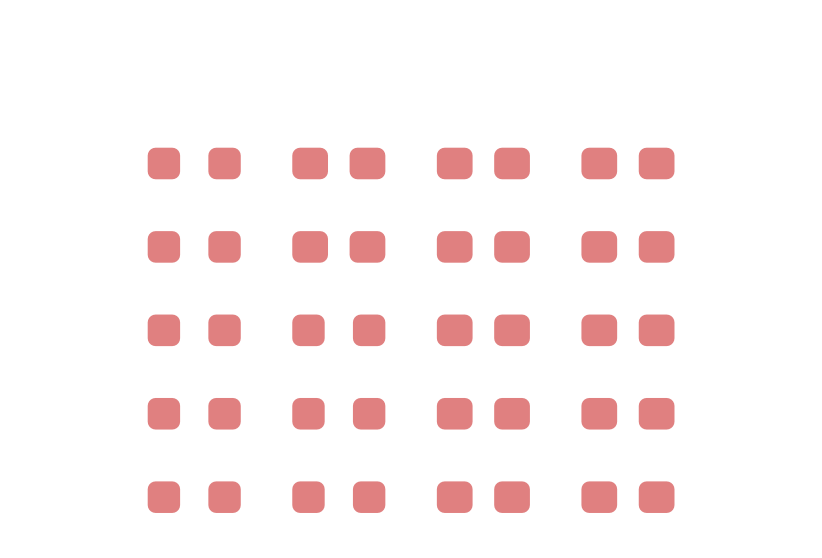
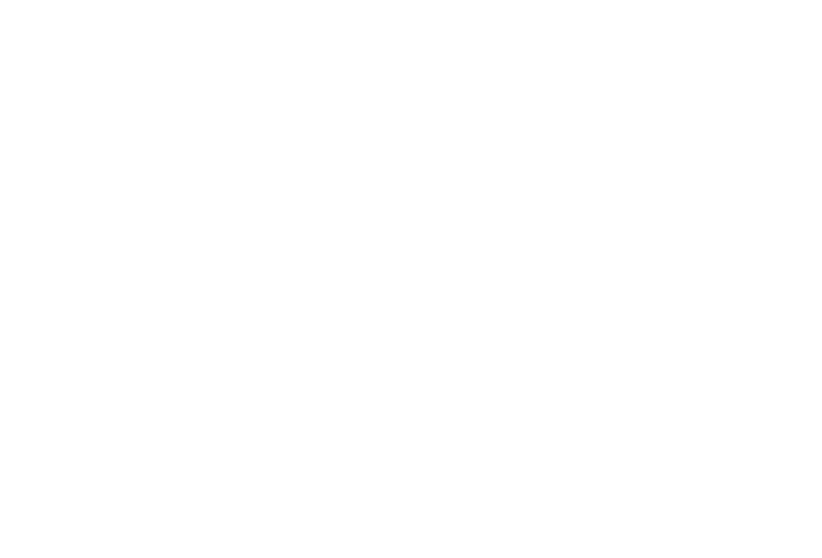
part: (194, 163) -> none
part: (338, 163) -> none
part: (483, 163) -> none
part: (627, 163) -> none
part: (194, 246) -> none
part: (338, 246) -> none
part: (483, 246) -> none
part: (627, 246) -> none
part: (194, 330) -> none
part: (338, 330) -> none
part: (483, 330) -> none
part: (627, 330) -> none
part: (194, 413) -> none
part: (338, 413) -> none
part: (483, 413) -> none
part: (627, 413) -> none
part: (194, 497) -> none
part: (338, 497) -> none
part: (483, 497) -> none
part: (627, 497) -> none

